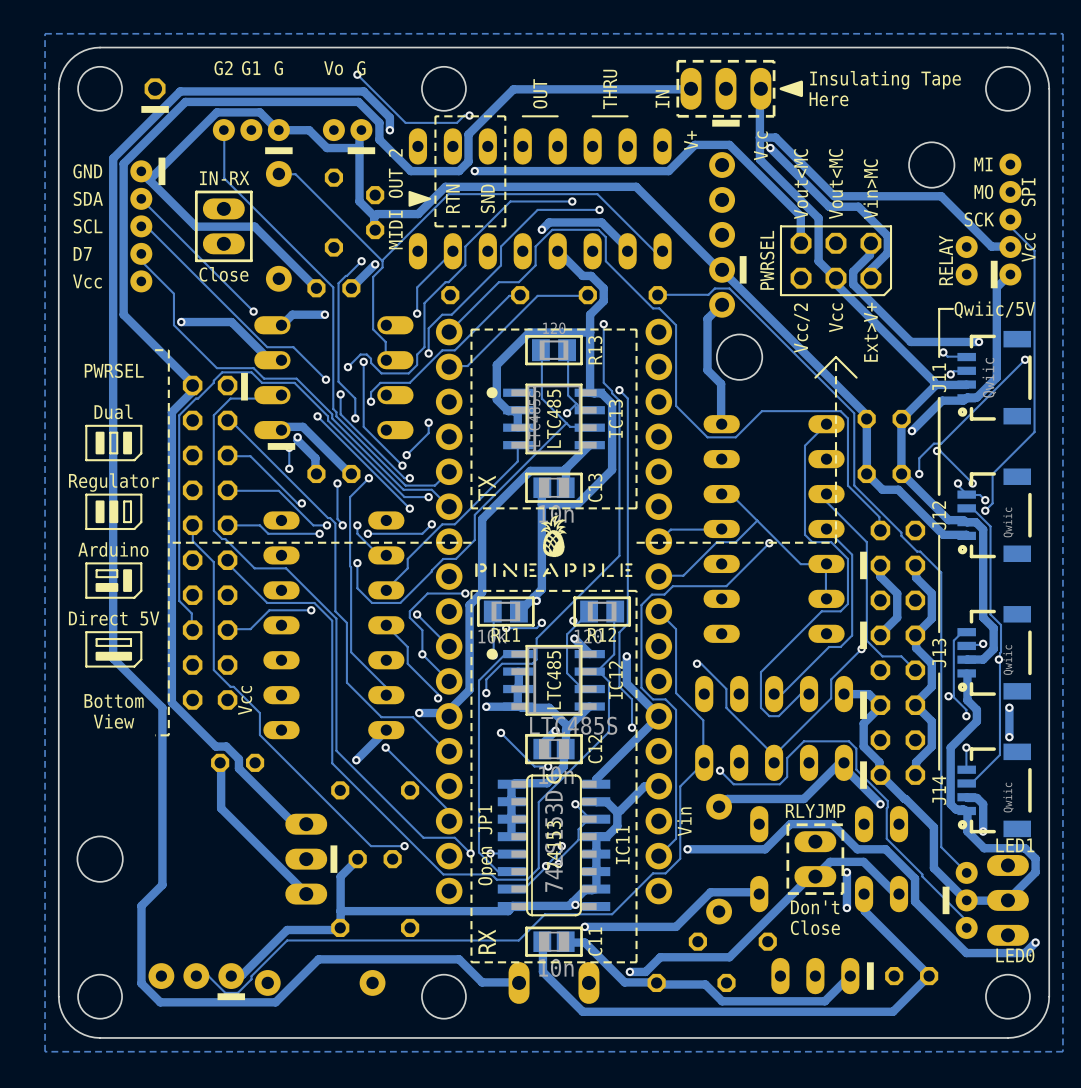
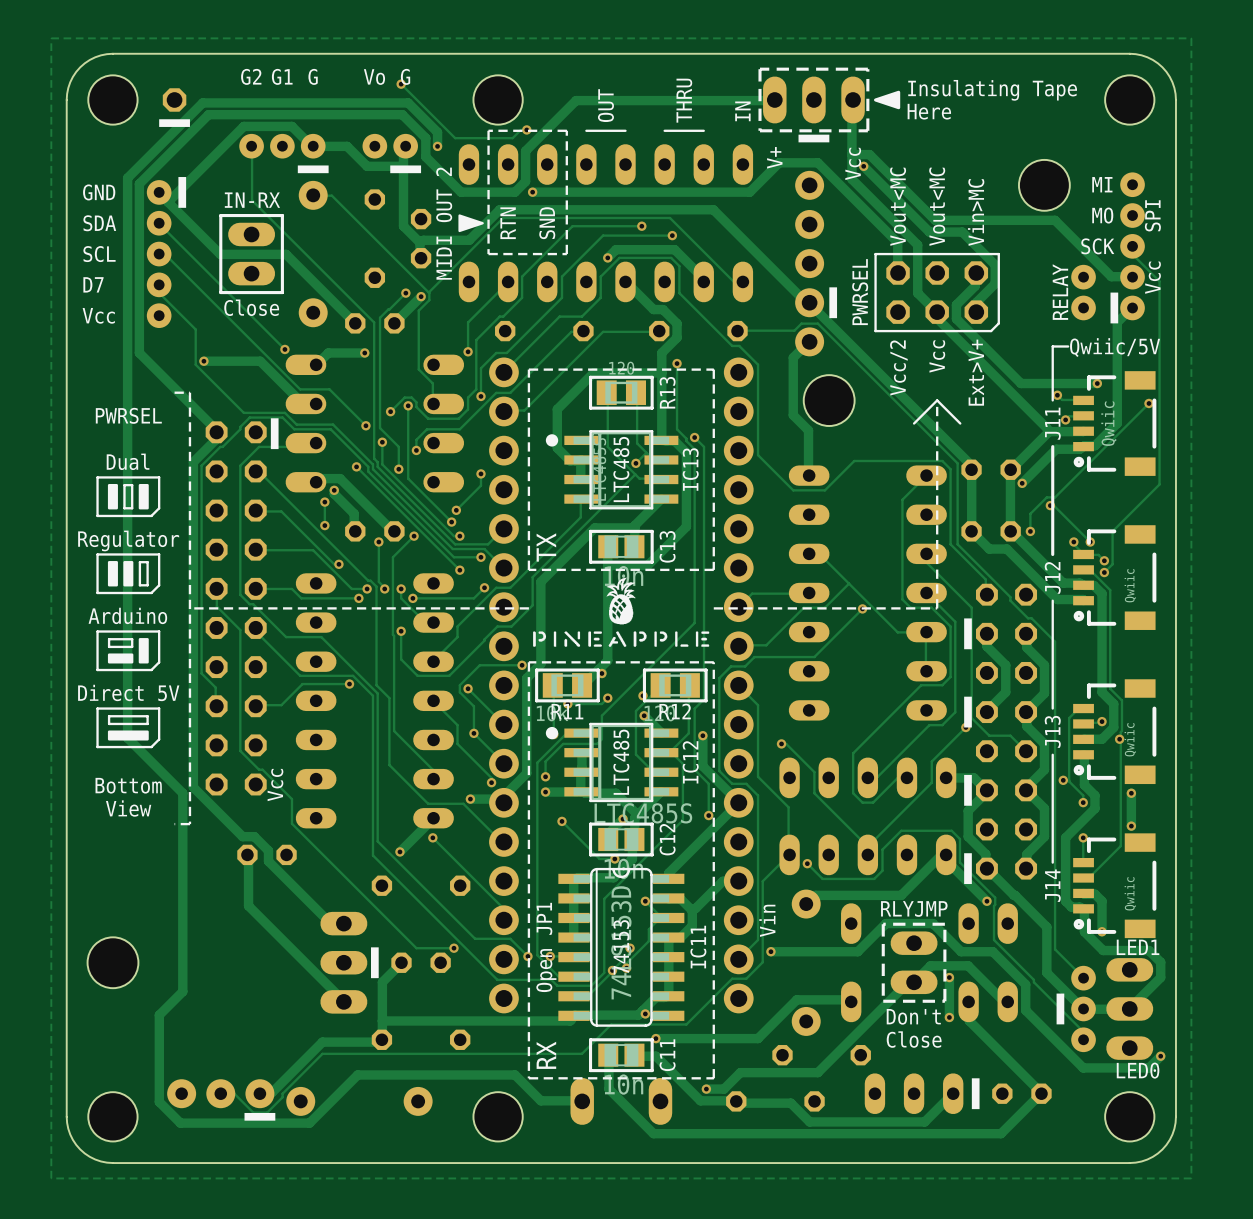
drawing: [267, 443, 296, 450] -> none

